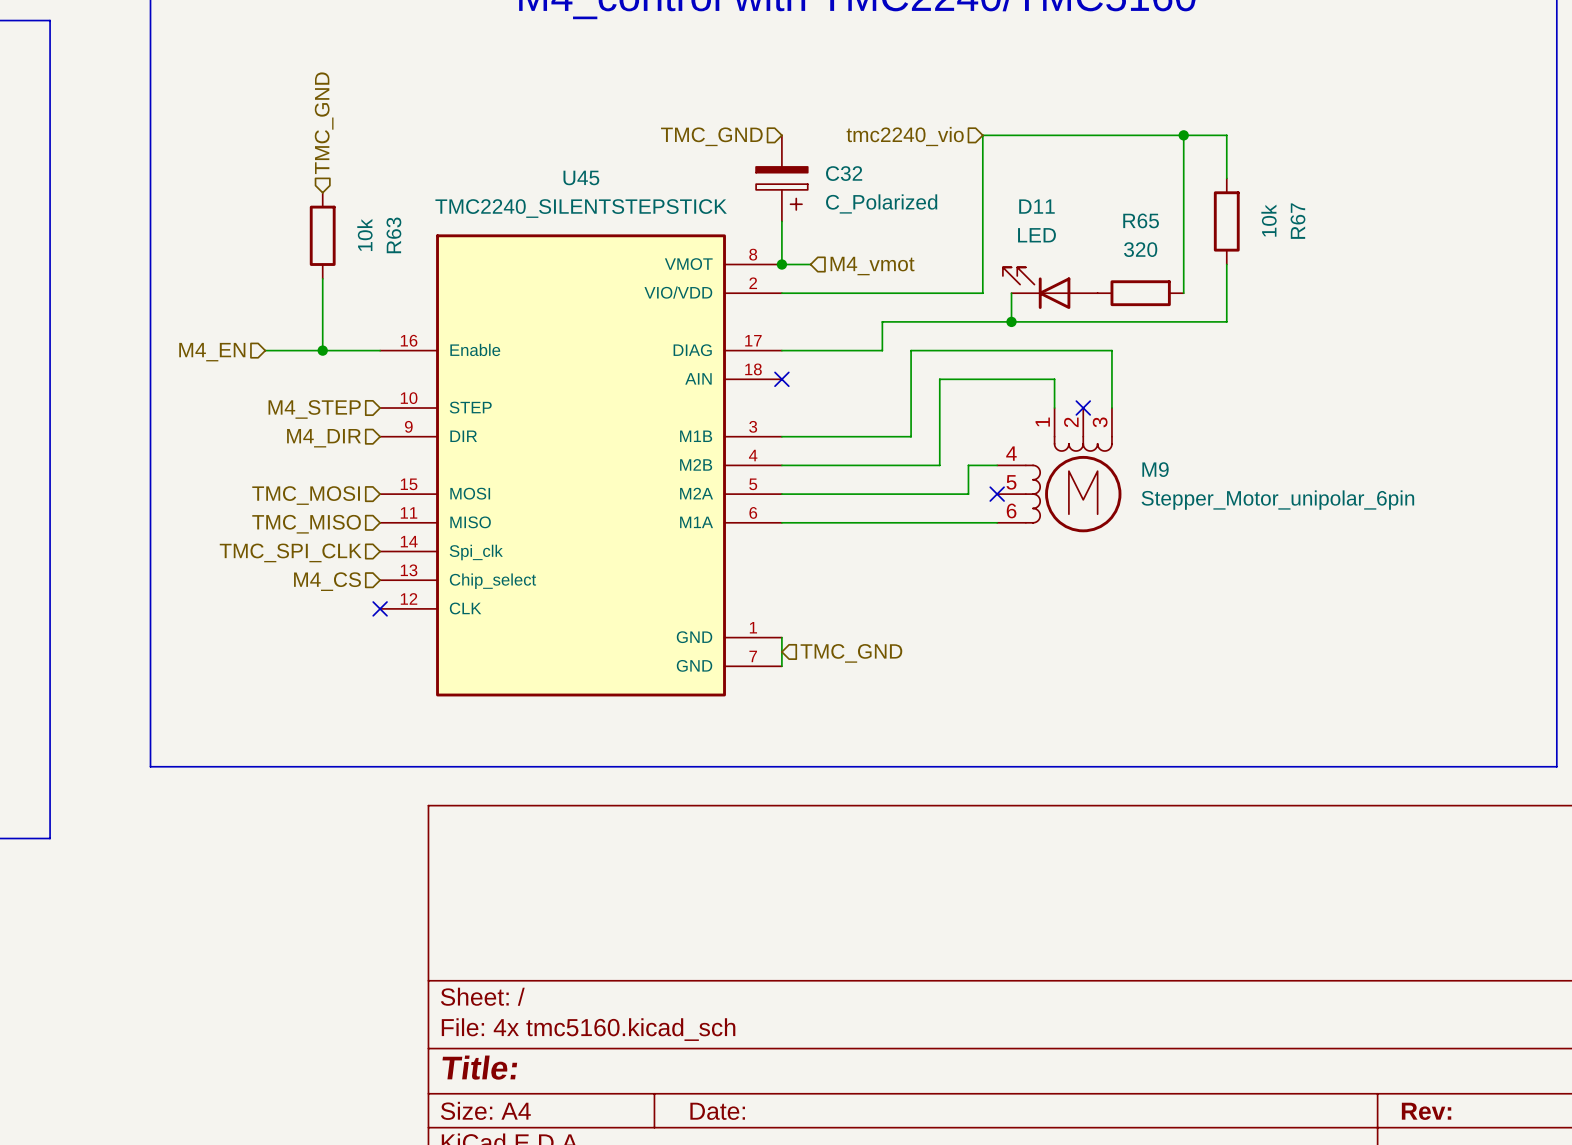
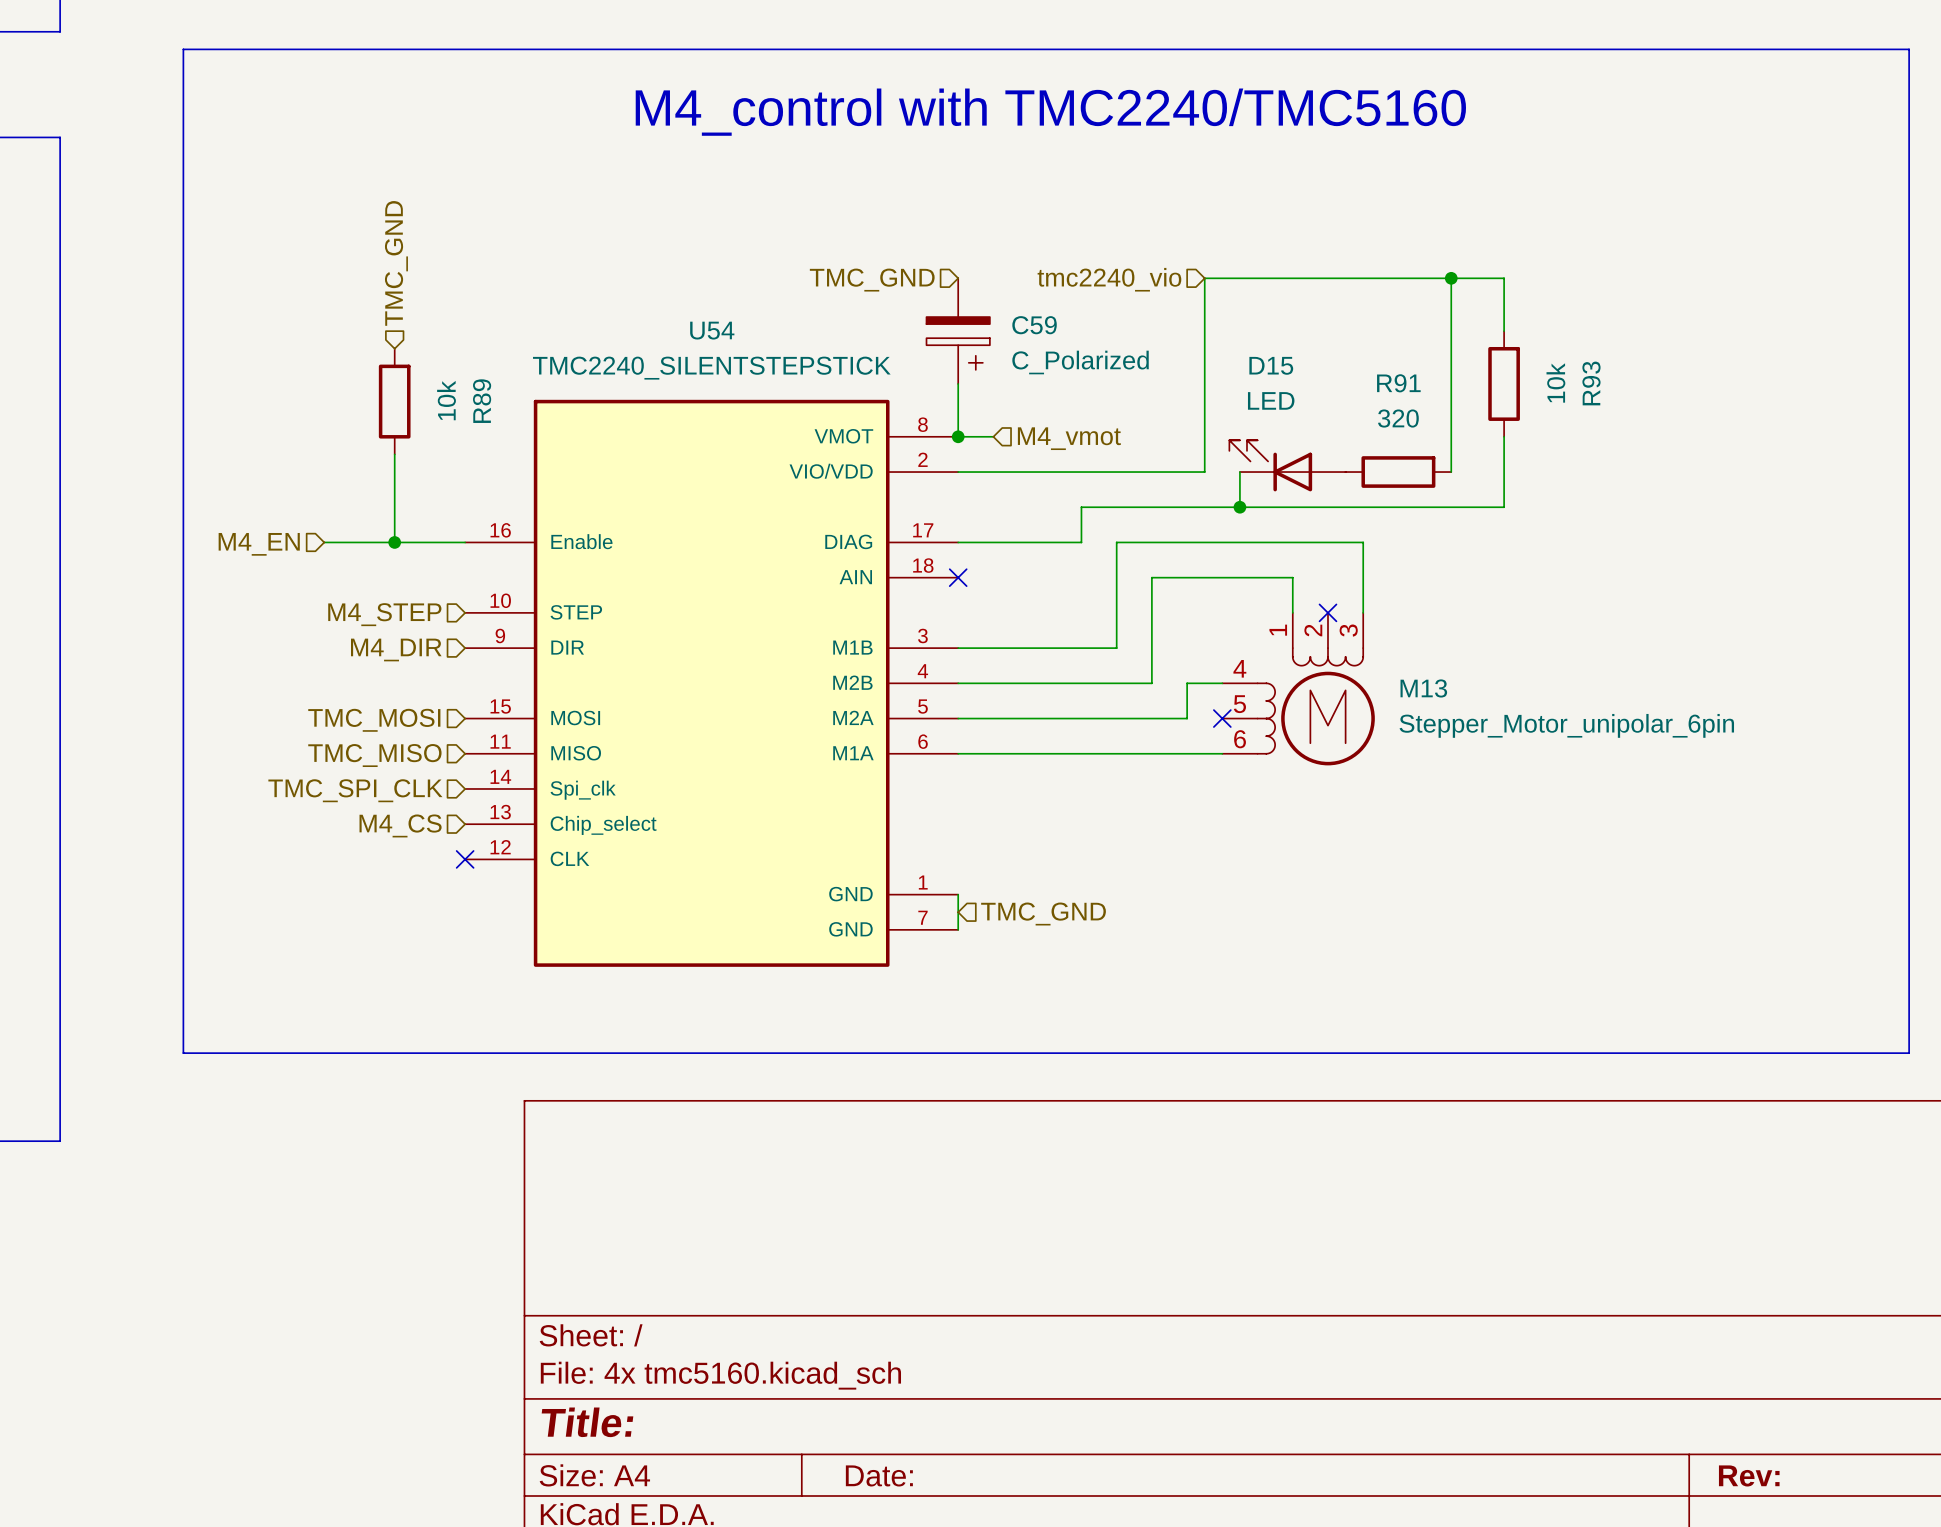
C32 name: C32 (844, 173) -> C59 (1034, 325)
U45 name: U45 (581, 177) -> U54 (712, 330)
D11 name: D11 (1036, 206) -> D15 (1271, 365)
R65 name: R65 (1141, 220) -> R91 (1398, 383)
R67 name: R67 (1297, 221) -> R93 (1591, 383)
R63 name: R63 (393, 235) -> R89 (482, 401)
M9 name: M9 (1155, 469) -> M13 (1423, 688)

